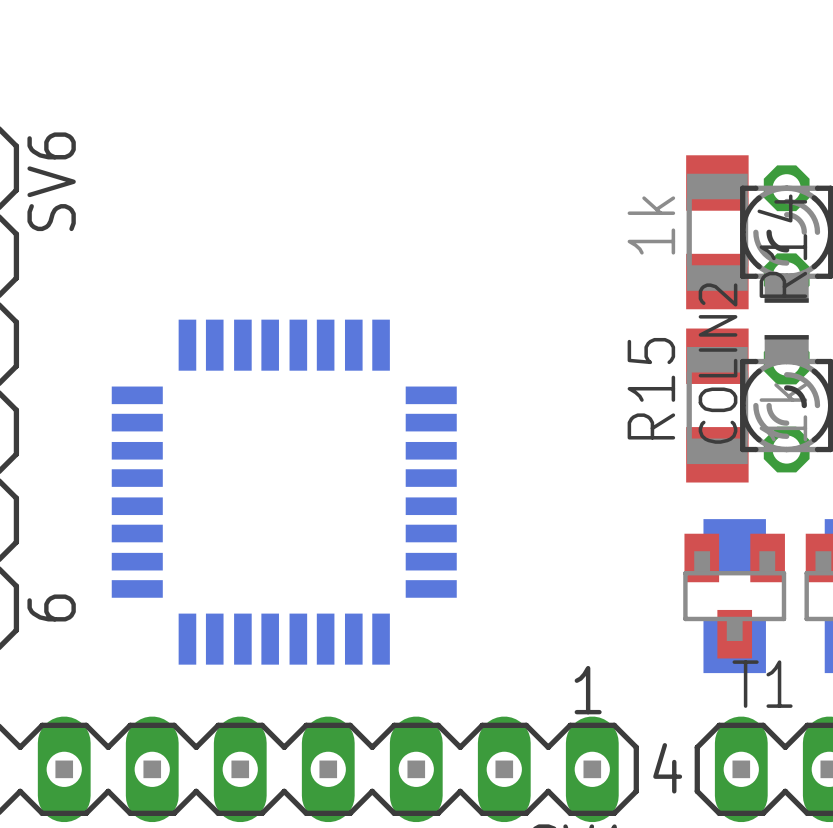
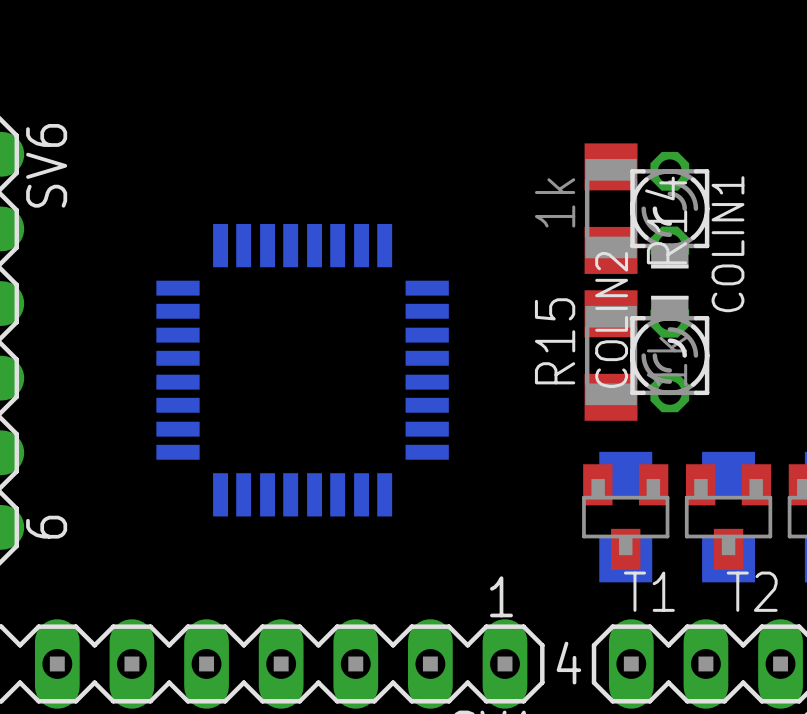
part position: (284, 492) -> (302, 370)

